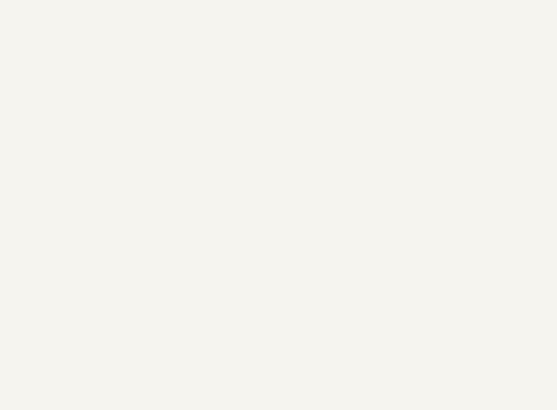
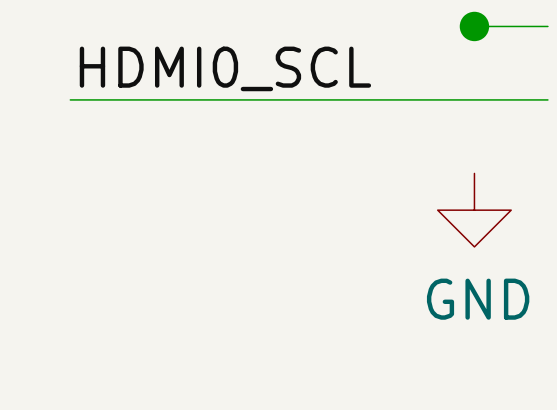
wire: none -> (474, 26) (547, 26)
junction: none -> (474, 26)
label: none -> HDMI0_SCL (225, 68)
wire: none -> (70, 99) (547, 99)
power symbol: none -> GND (474, 210)

